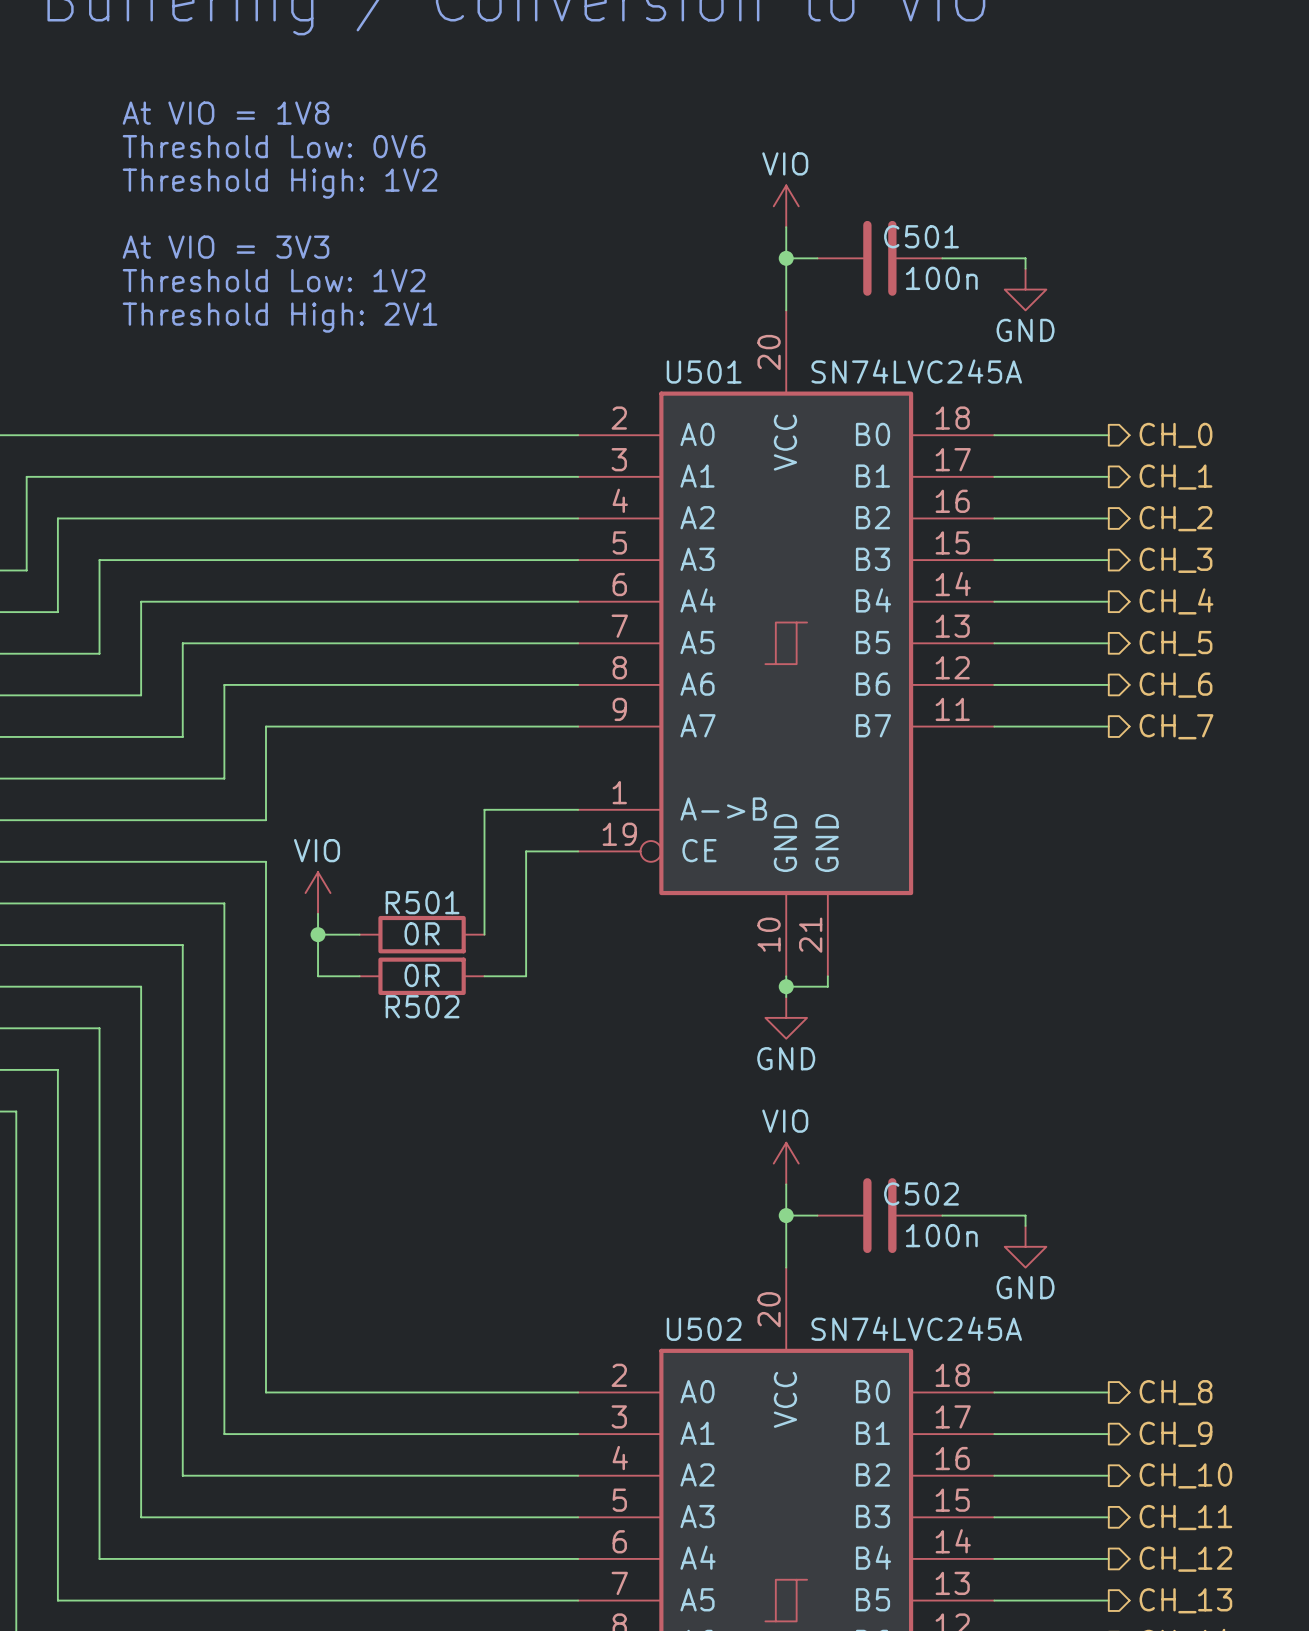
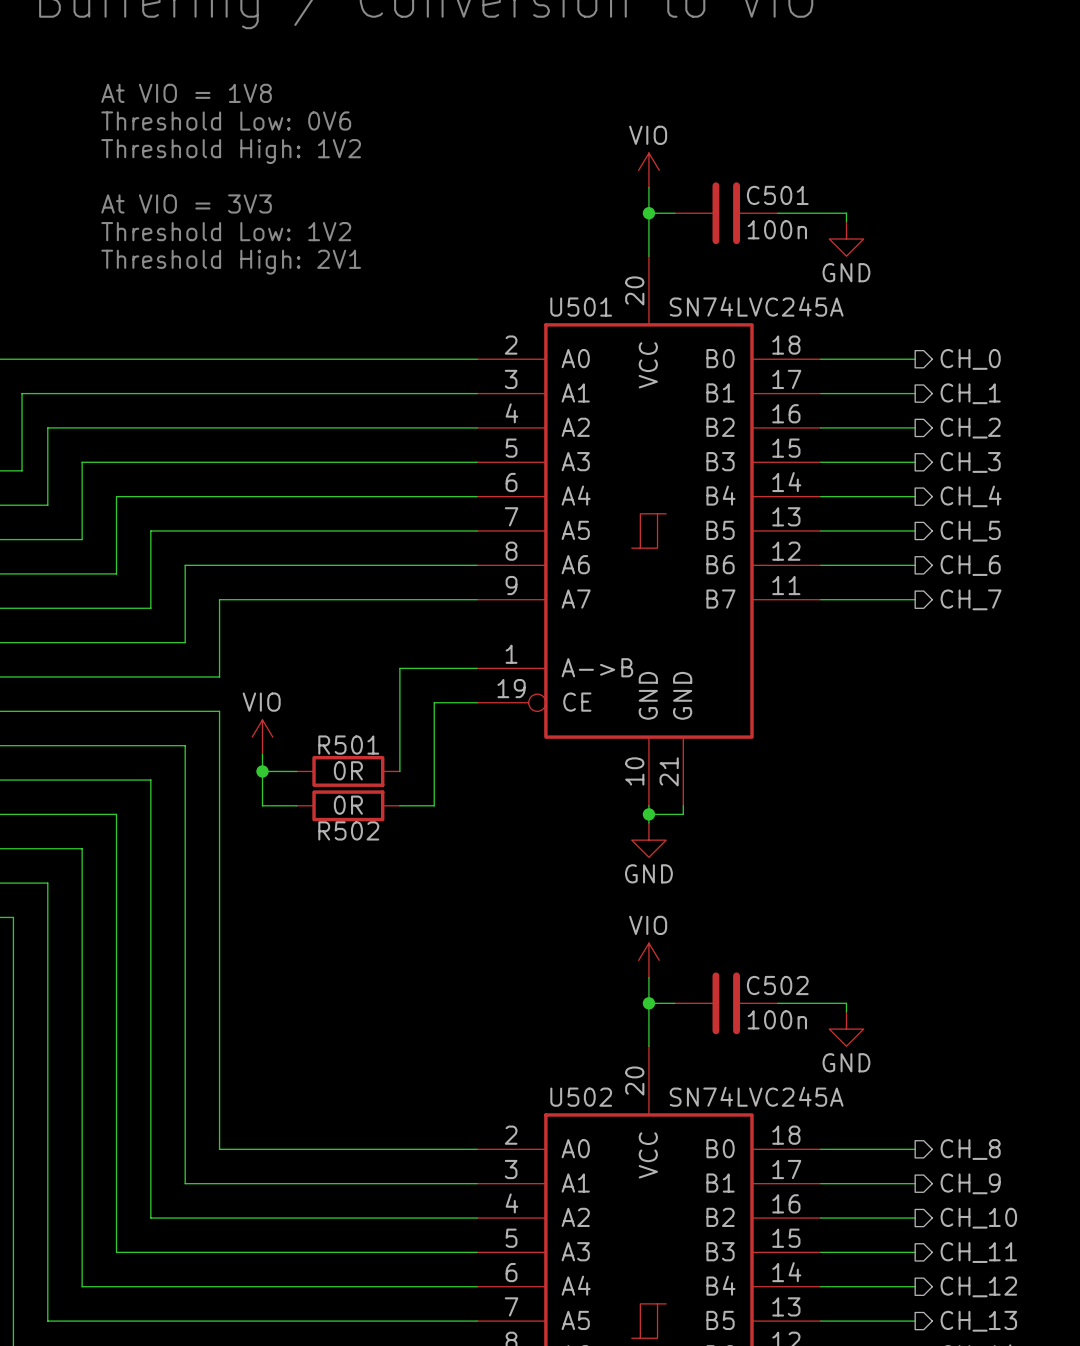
C501 name position: C501 (921, 236) -> C501 (777, 195)
C502 name position: C502 (921, 1194) -> C502 (777, 985)

